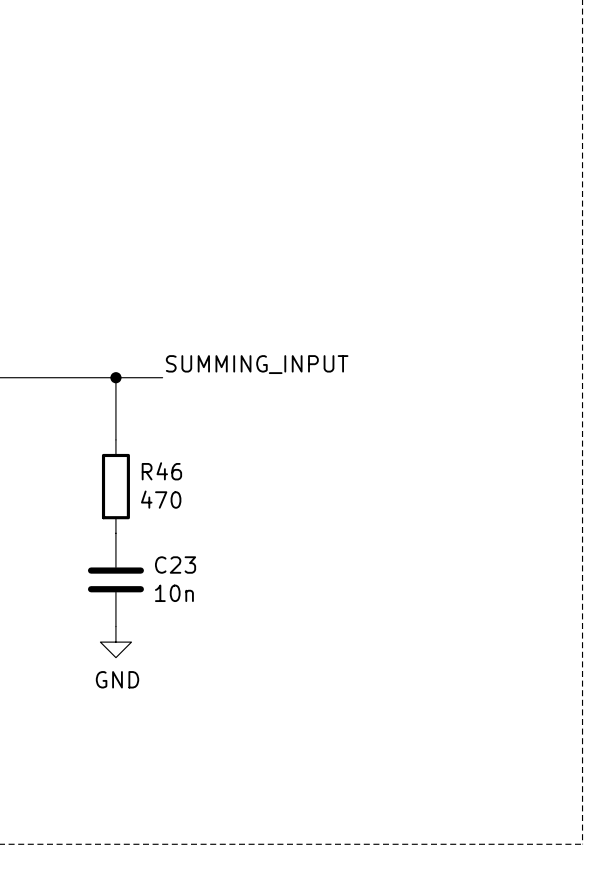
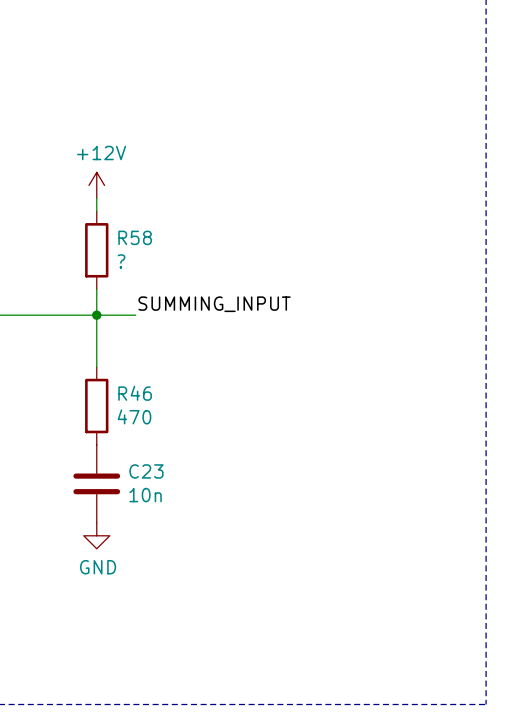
power symbol: none -> +12V (96, 185)
wire: none -> (96, 198) (96, 211)
R58: none -> ? (96, 250)
wire: none -> (96, 289) (96, 315)

